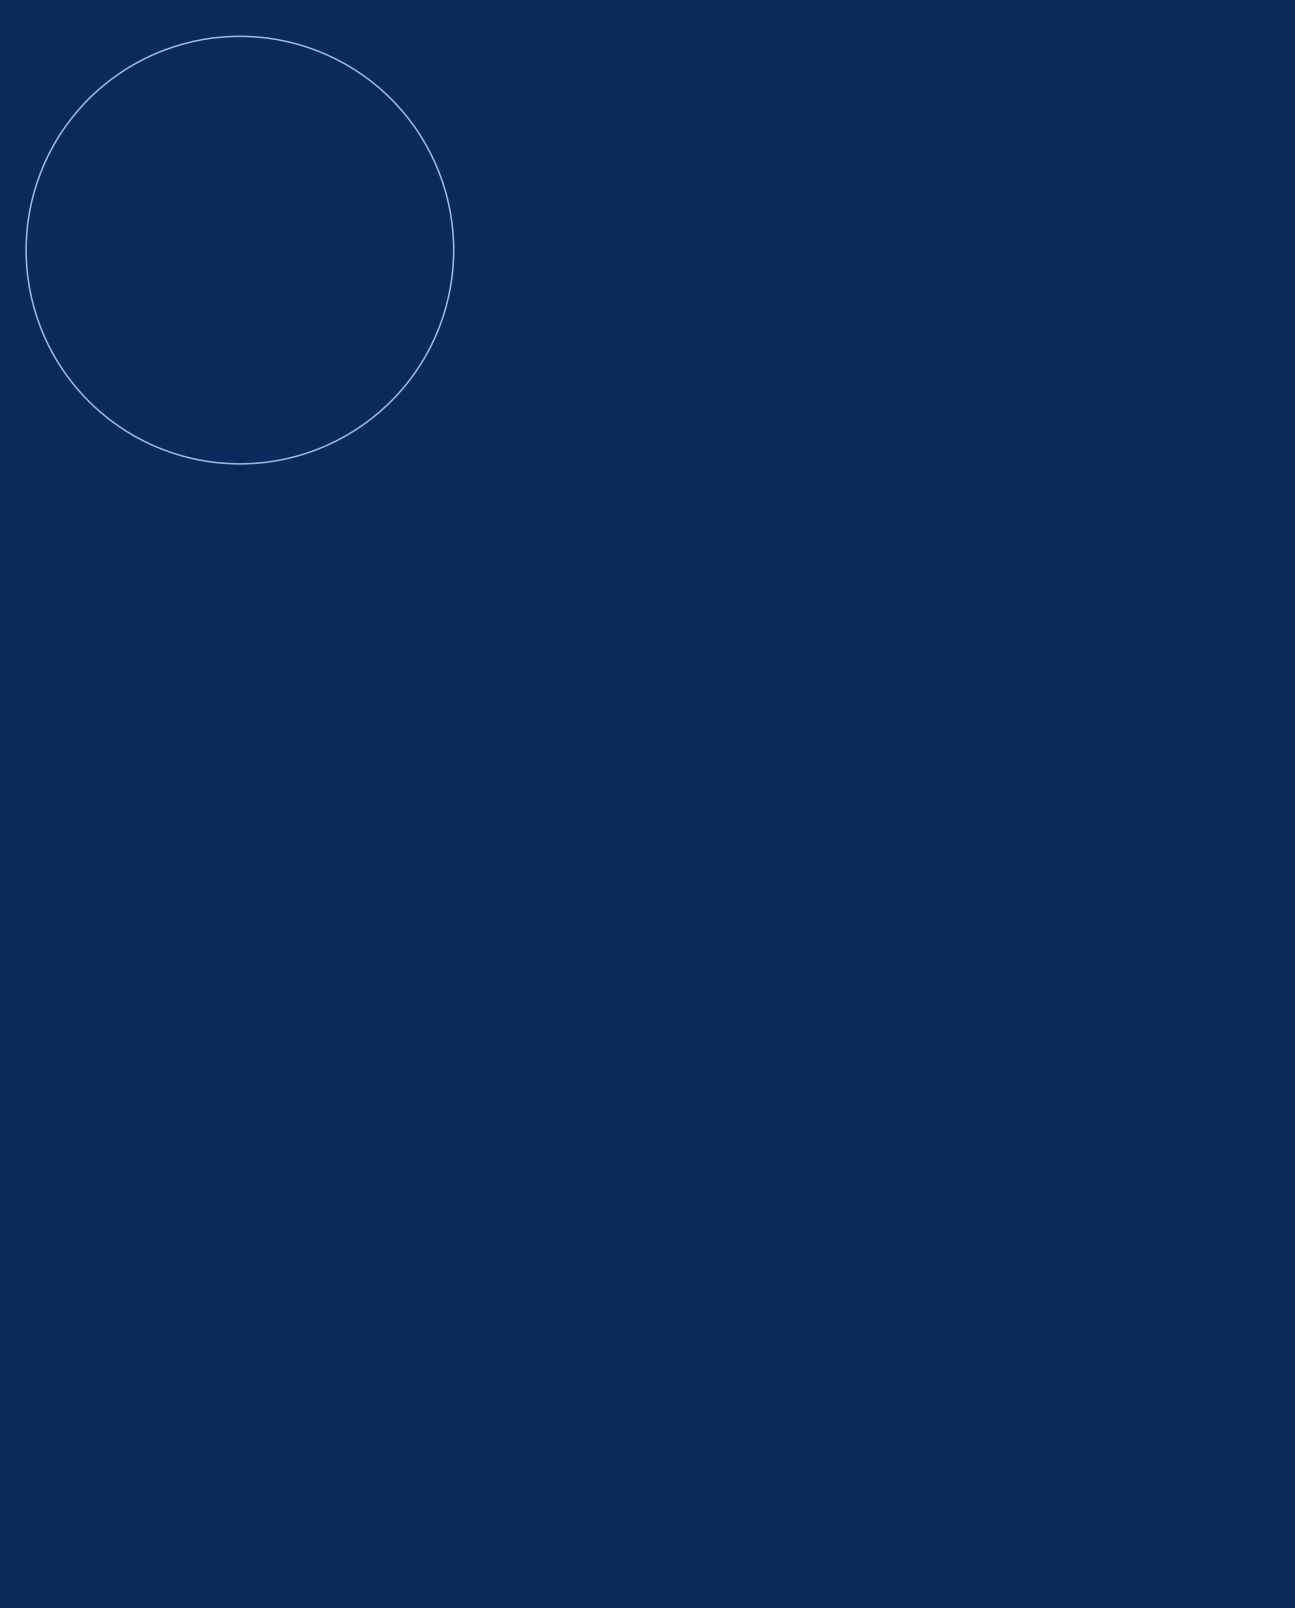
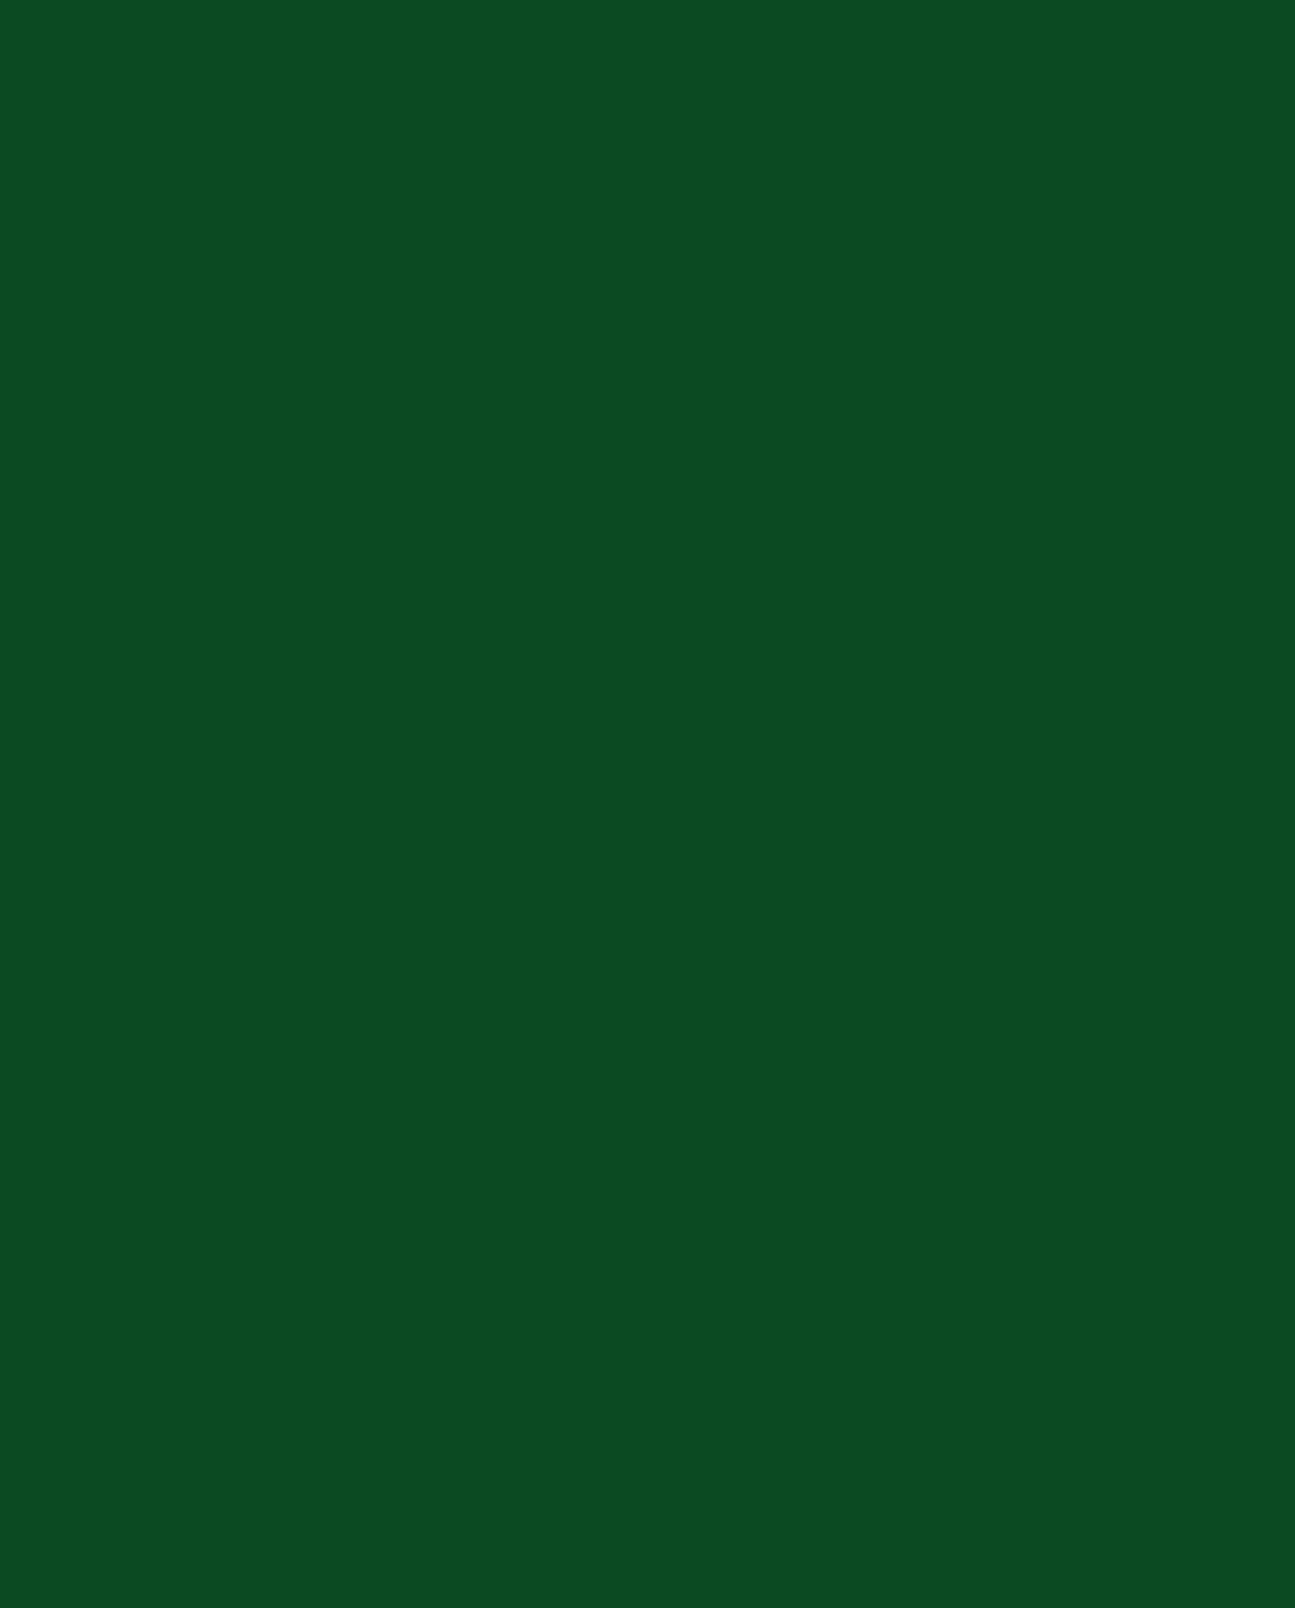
drawing: [25, 35, 455, 465] -> none

